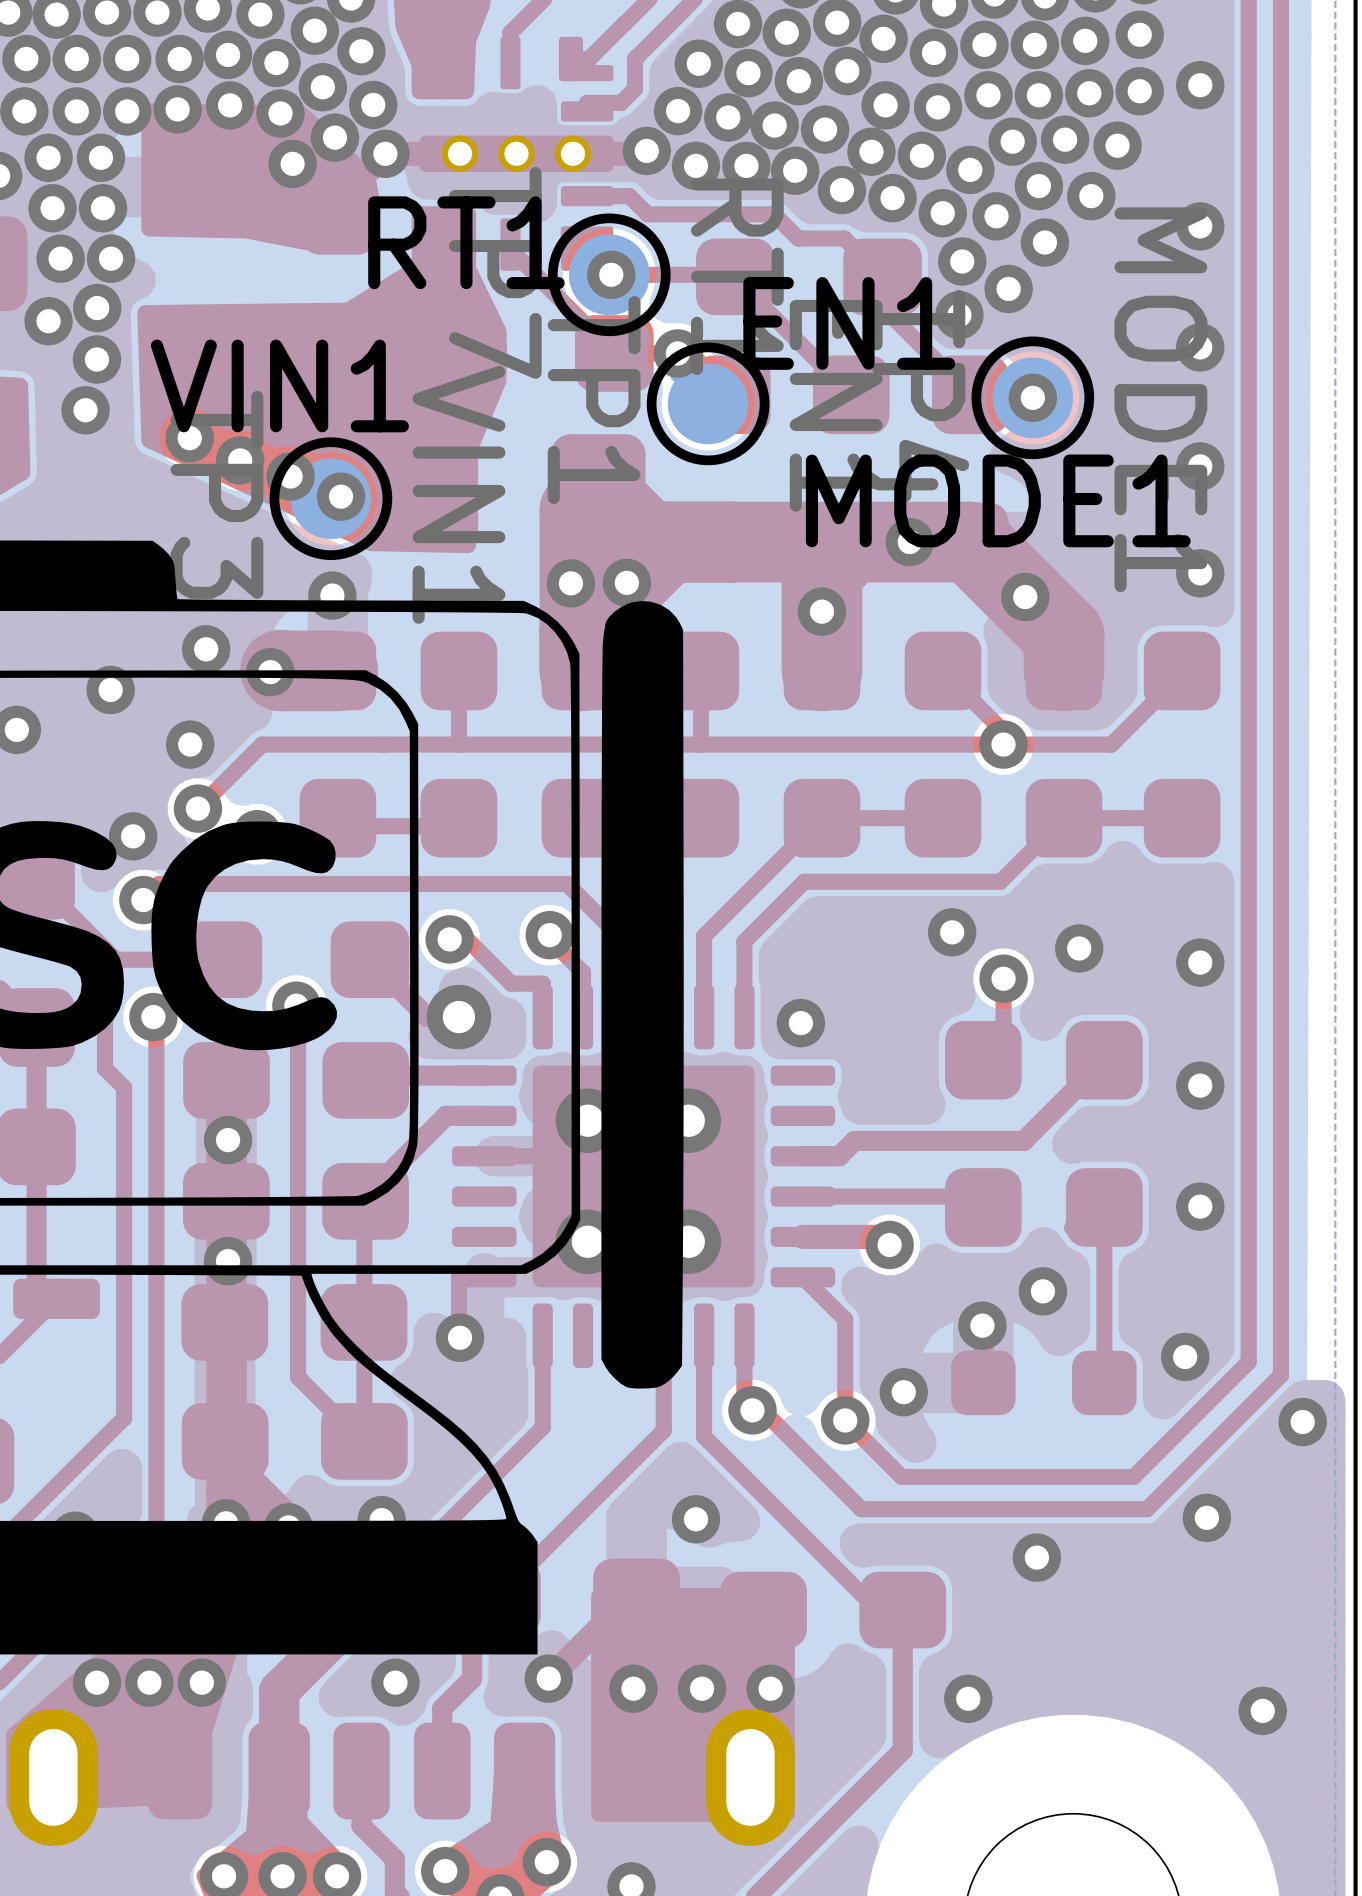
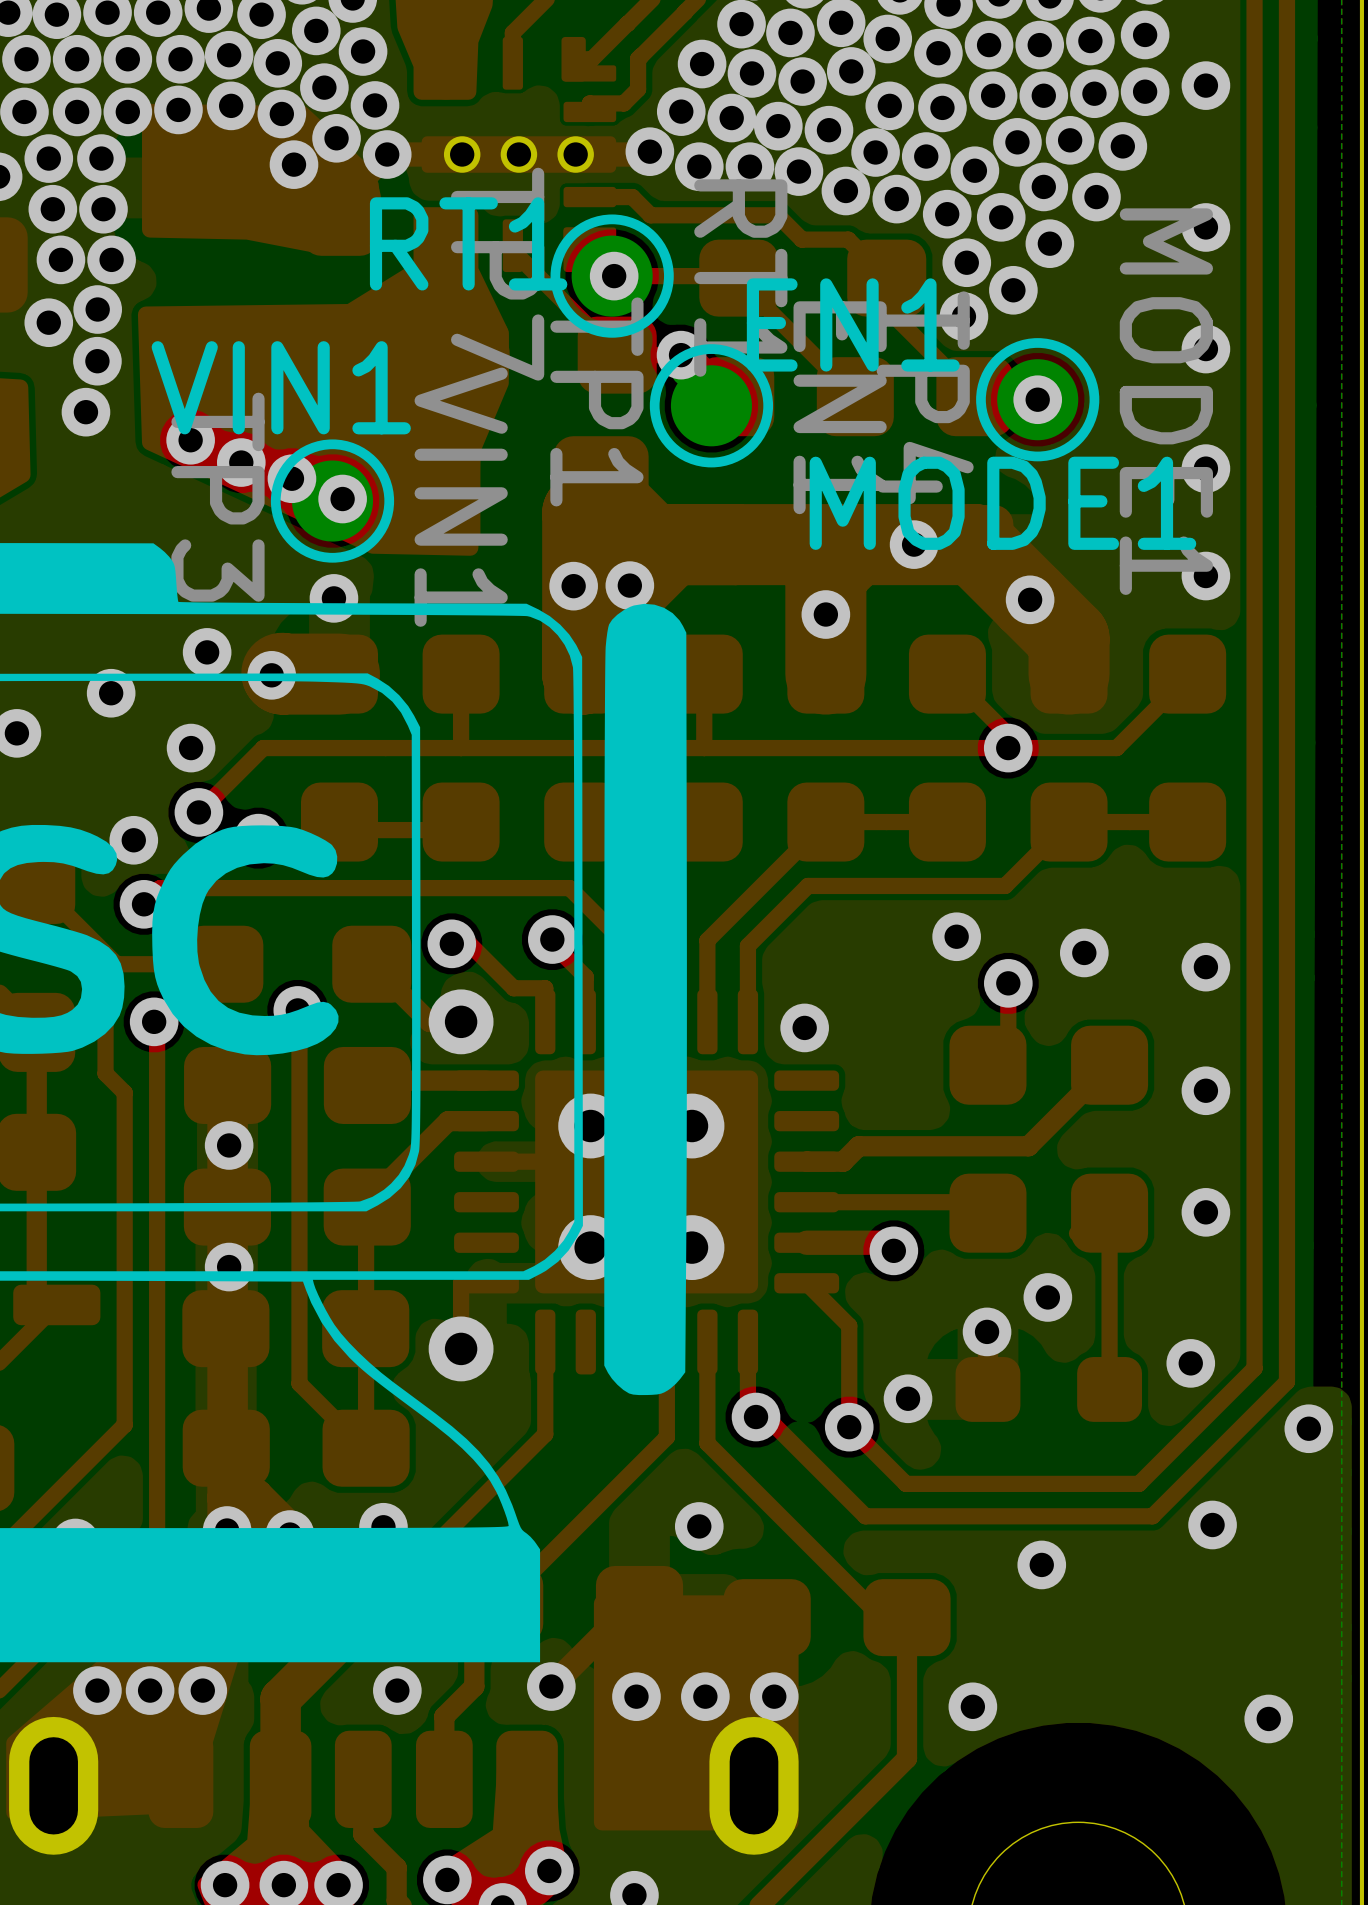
via size: [435, 1313, 485, 1362] -> [428, 1316, 494, 1382]

